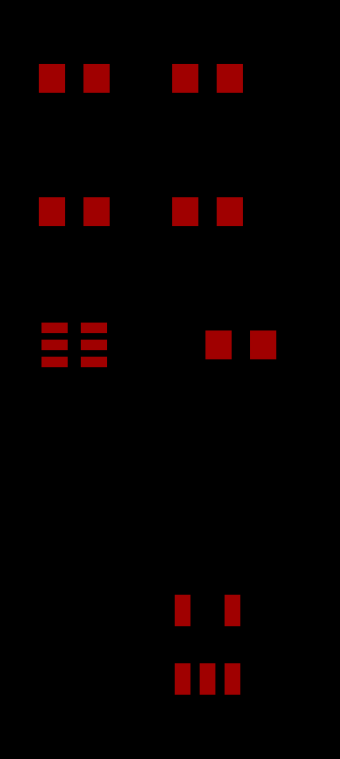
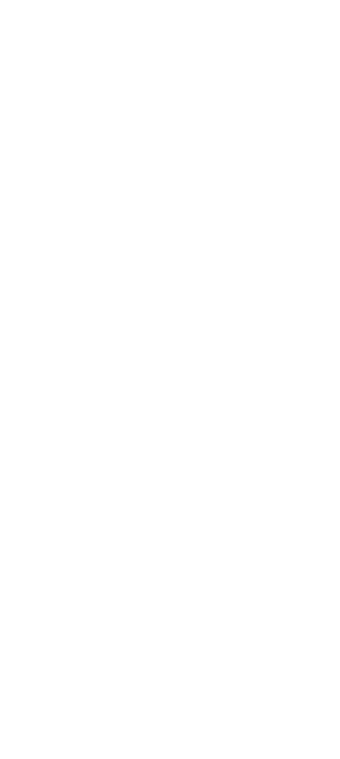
part: (74, 78) -> none
part: (207, 78) -> none
part: (74, 211) -> none
part: (207, 211) -> none
part: (74, 344) -> none
part: (240, 344) -> none
part: (207, 644) -> none

